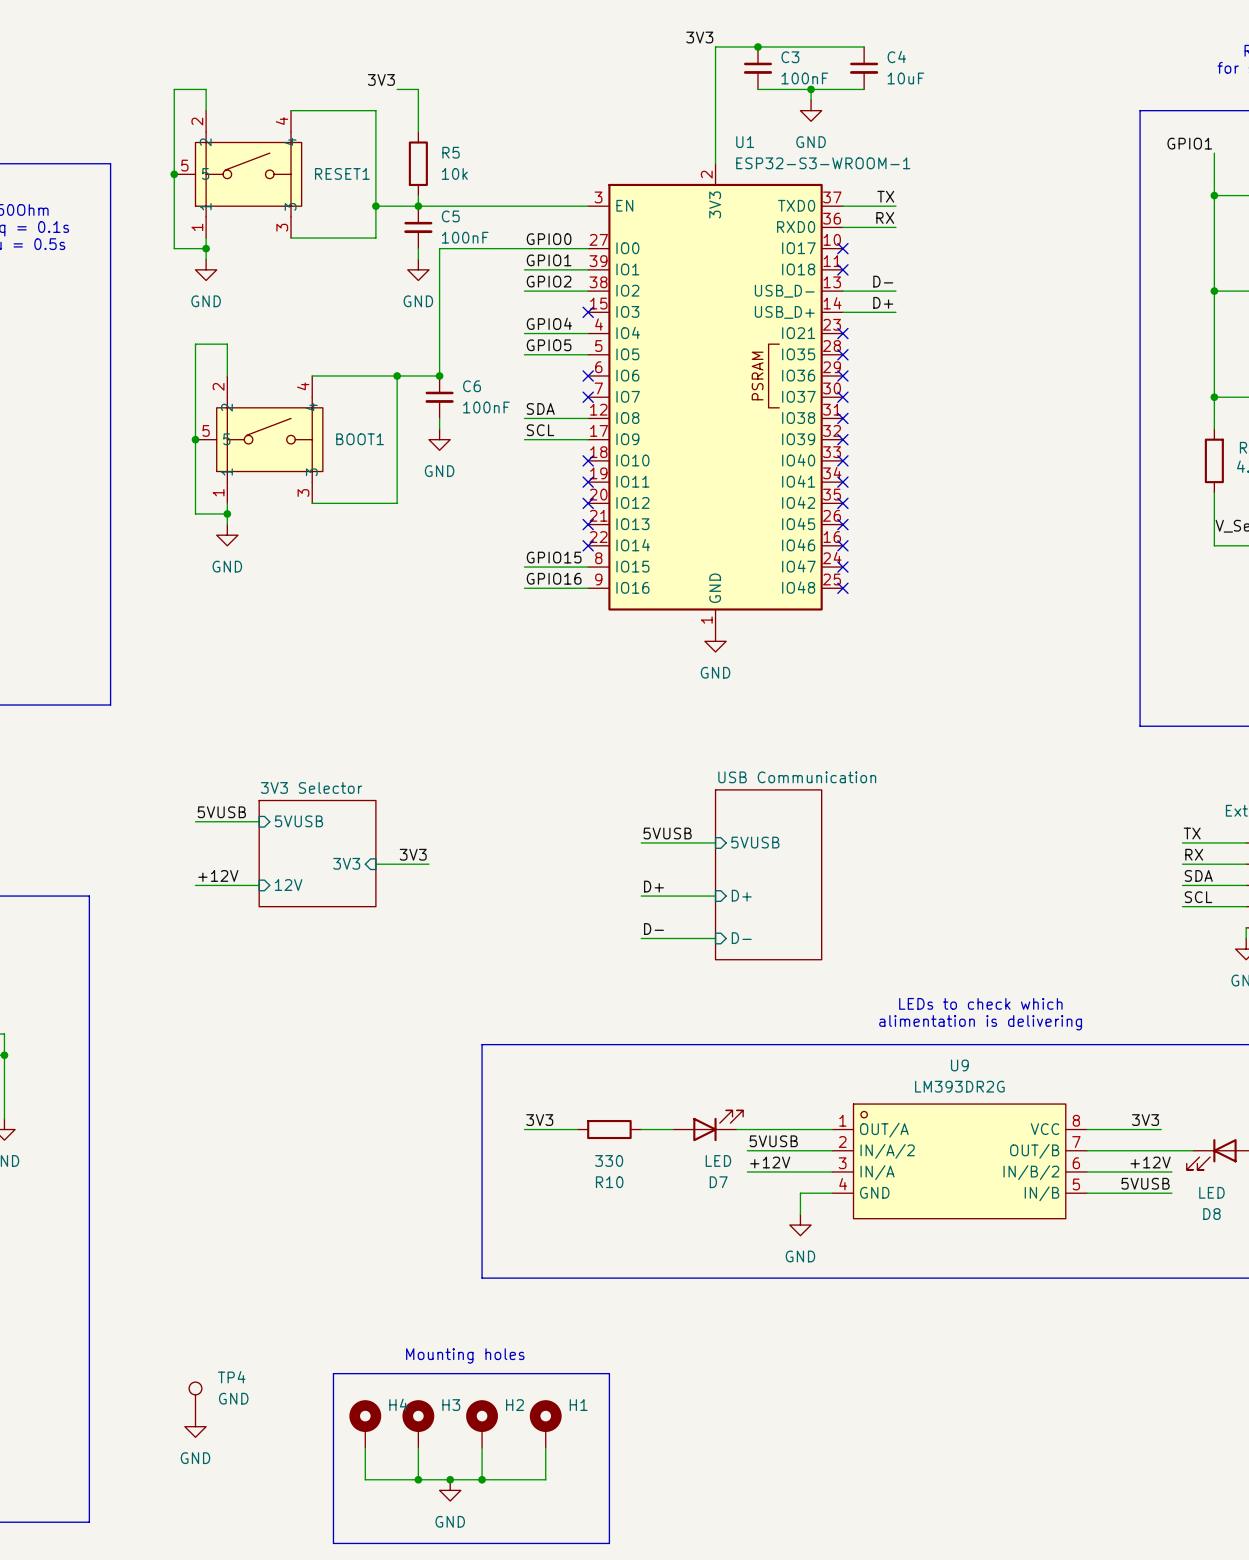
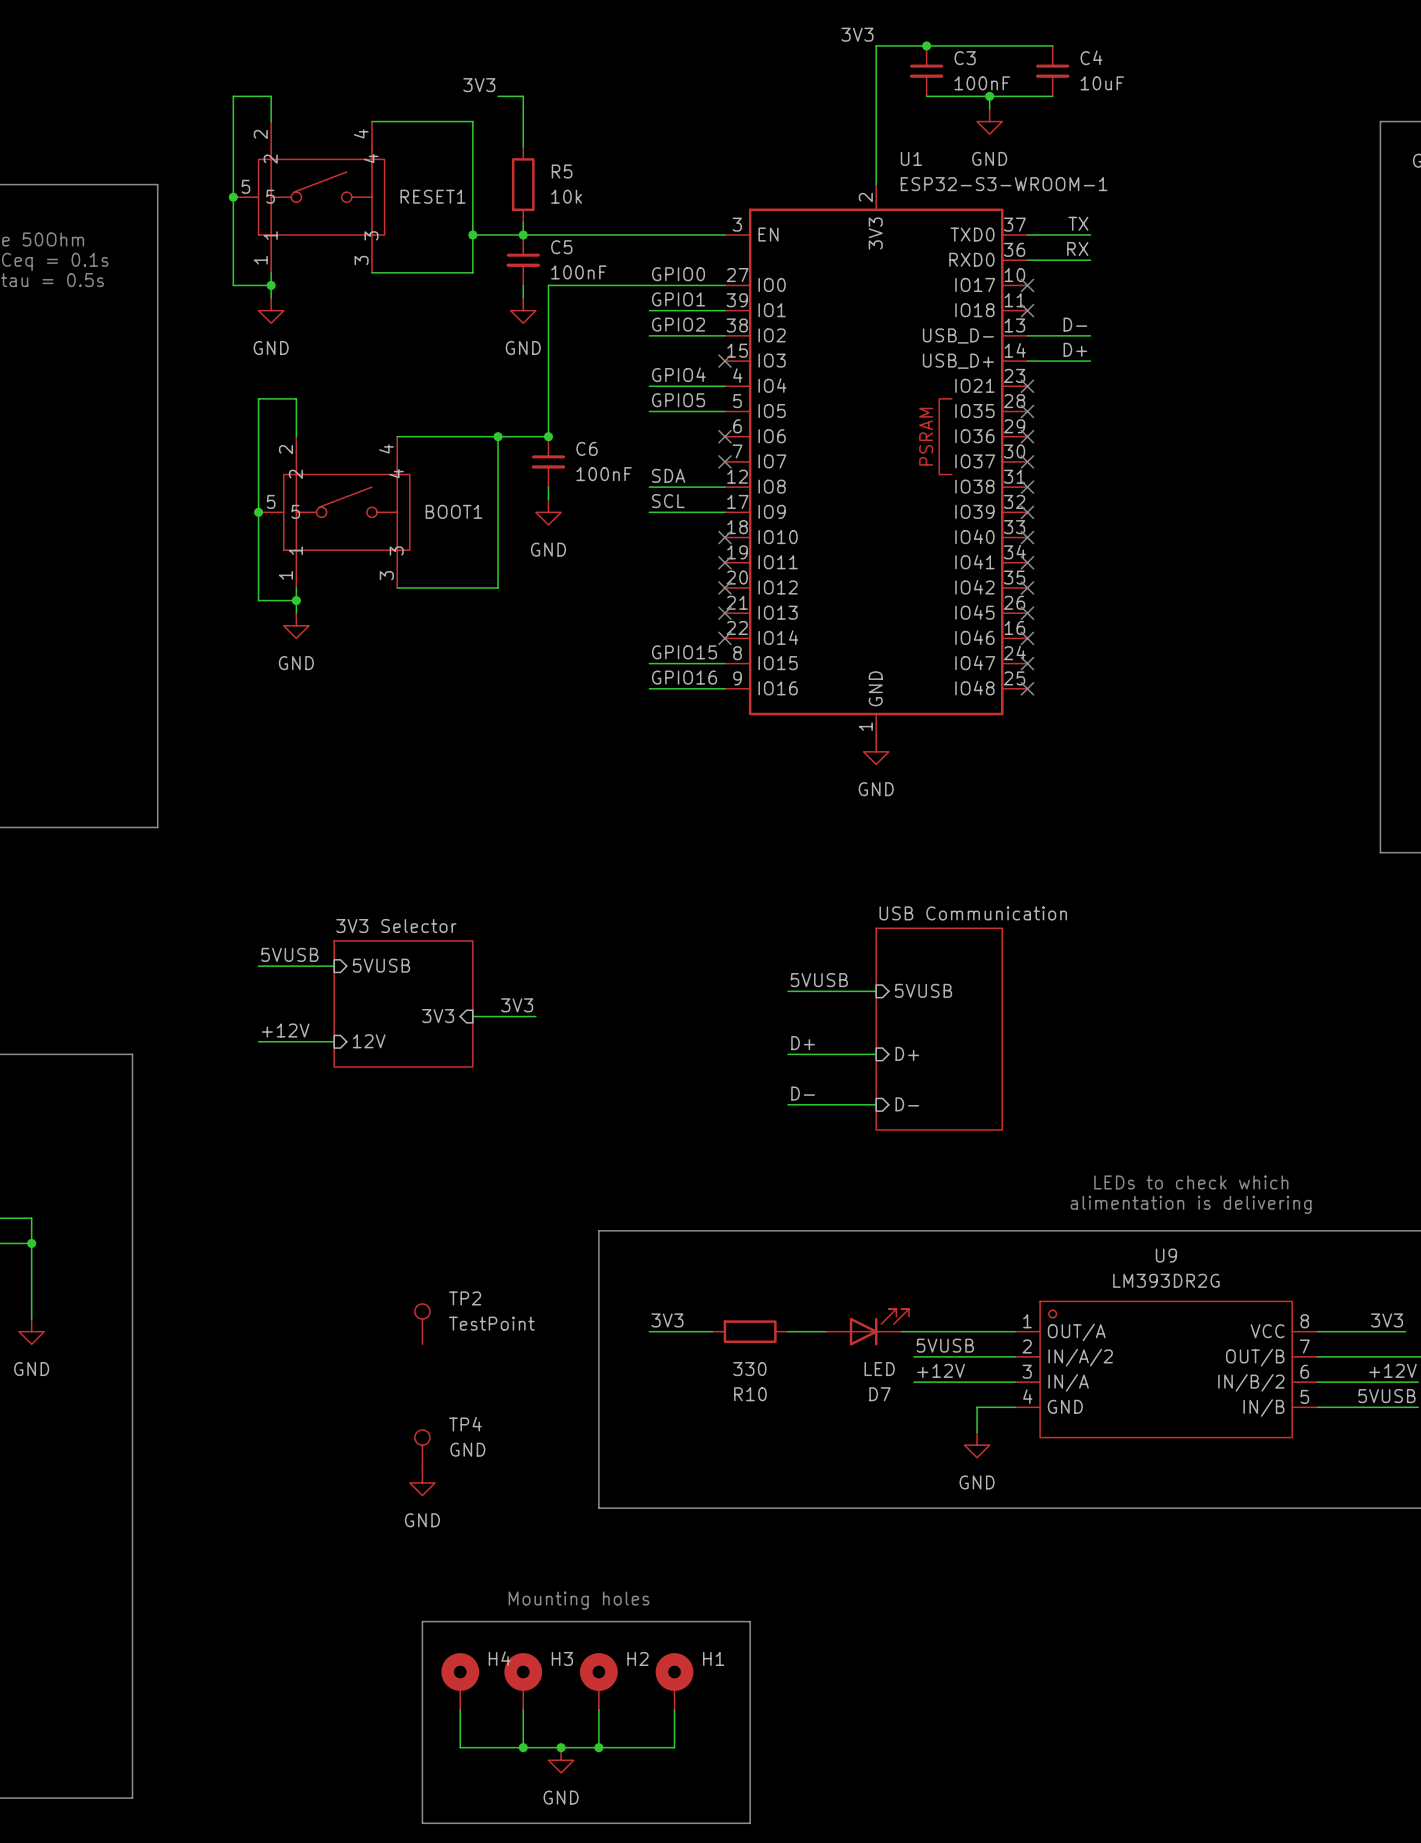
TP2: none -> TestPoint (422, 1324)
power symbol: none -> GND (422, 1482)
TP4 position: (195, 1399) -> (422, 1450)
power symbol: GND (195, 1426) -> none

